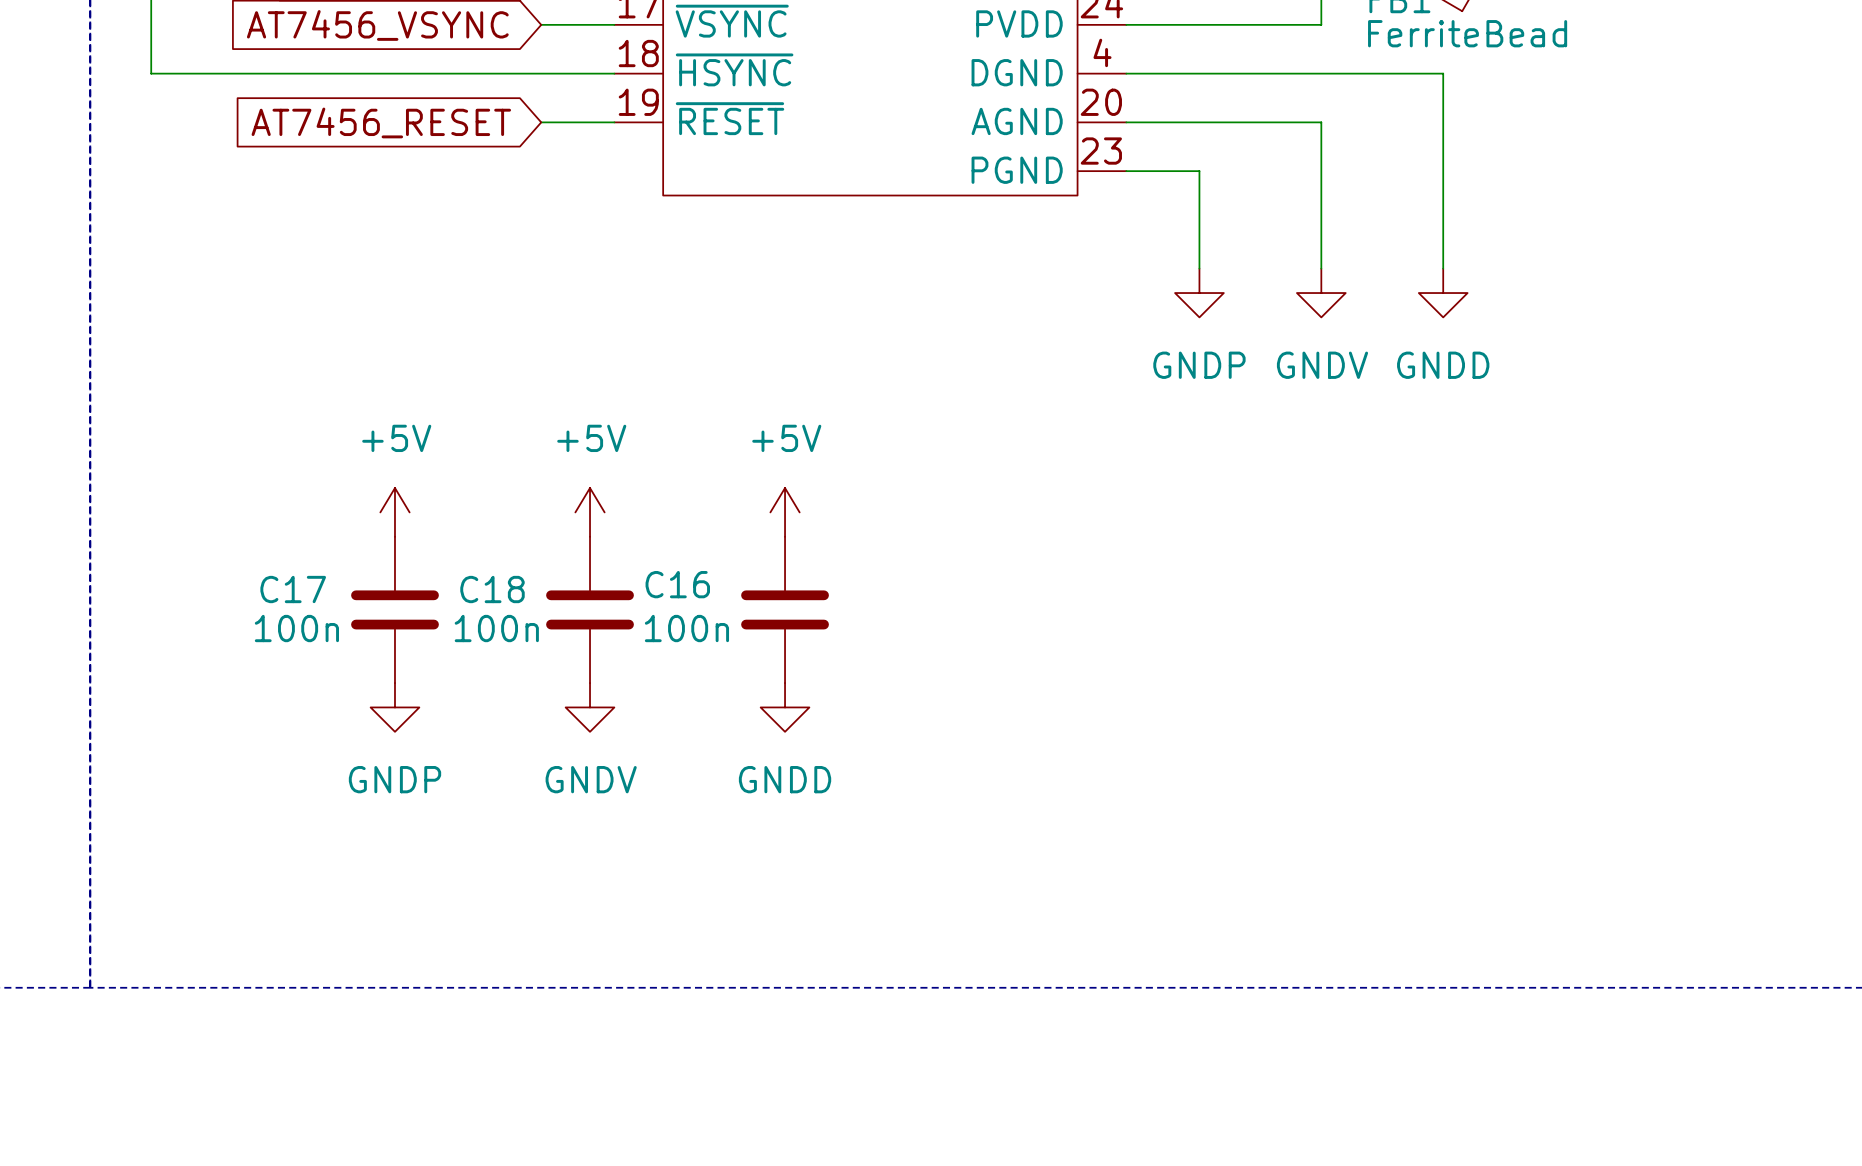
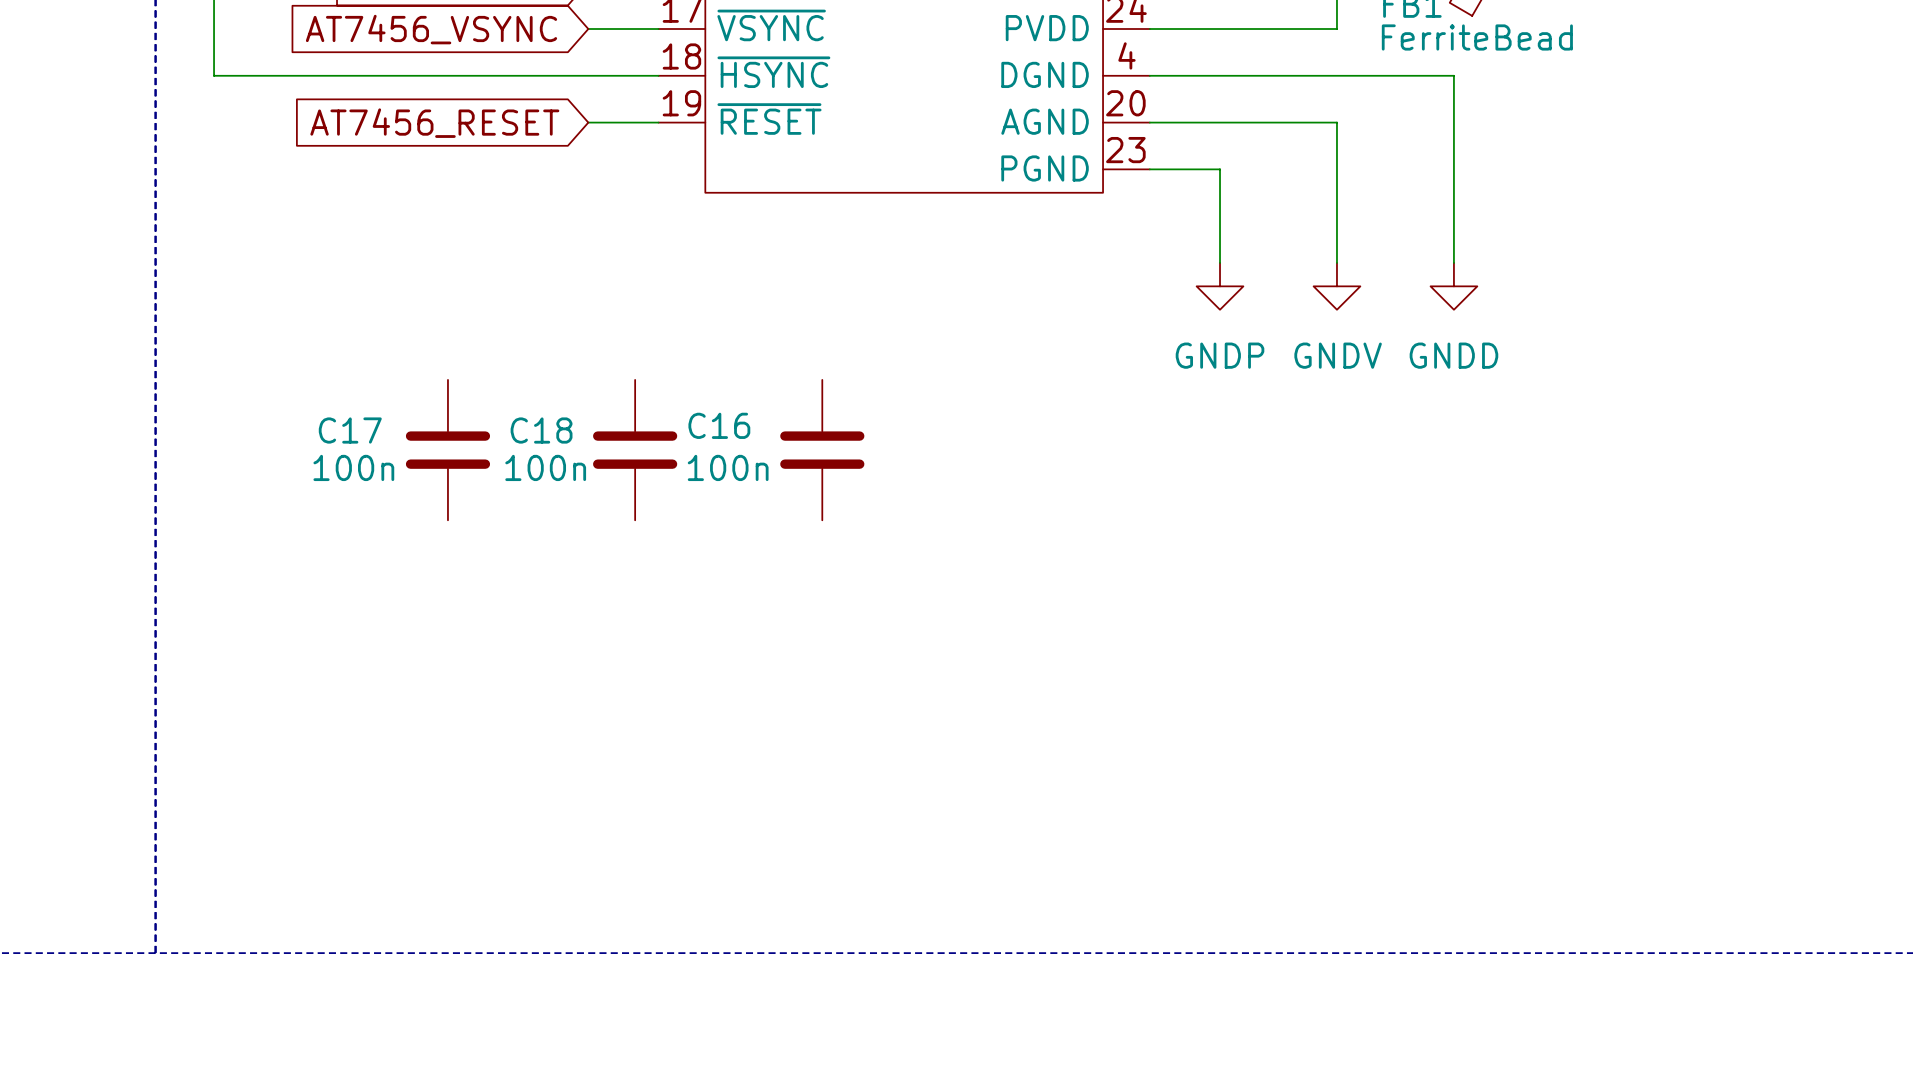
power symbol: +5V (394, 512) -> none
power symbol: +5V (590, 512) -> none
power symbol: +5V (785, 512) -> none
C17 position: (394, 609) -> (447, 450)
C18 position: (590, 609) -> (635, 450)
C16 position: (785, 609) -> (822, 450)
power symbol: GNDP (394, 707) -> none
power symbol: GNDV (590, 707) -> none
power symbol: GNDD (785, 707) -> none

